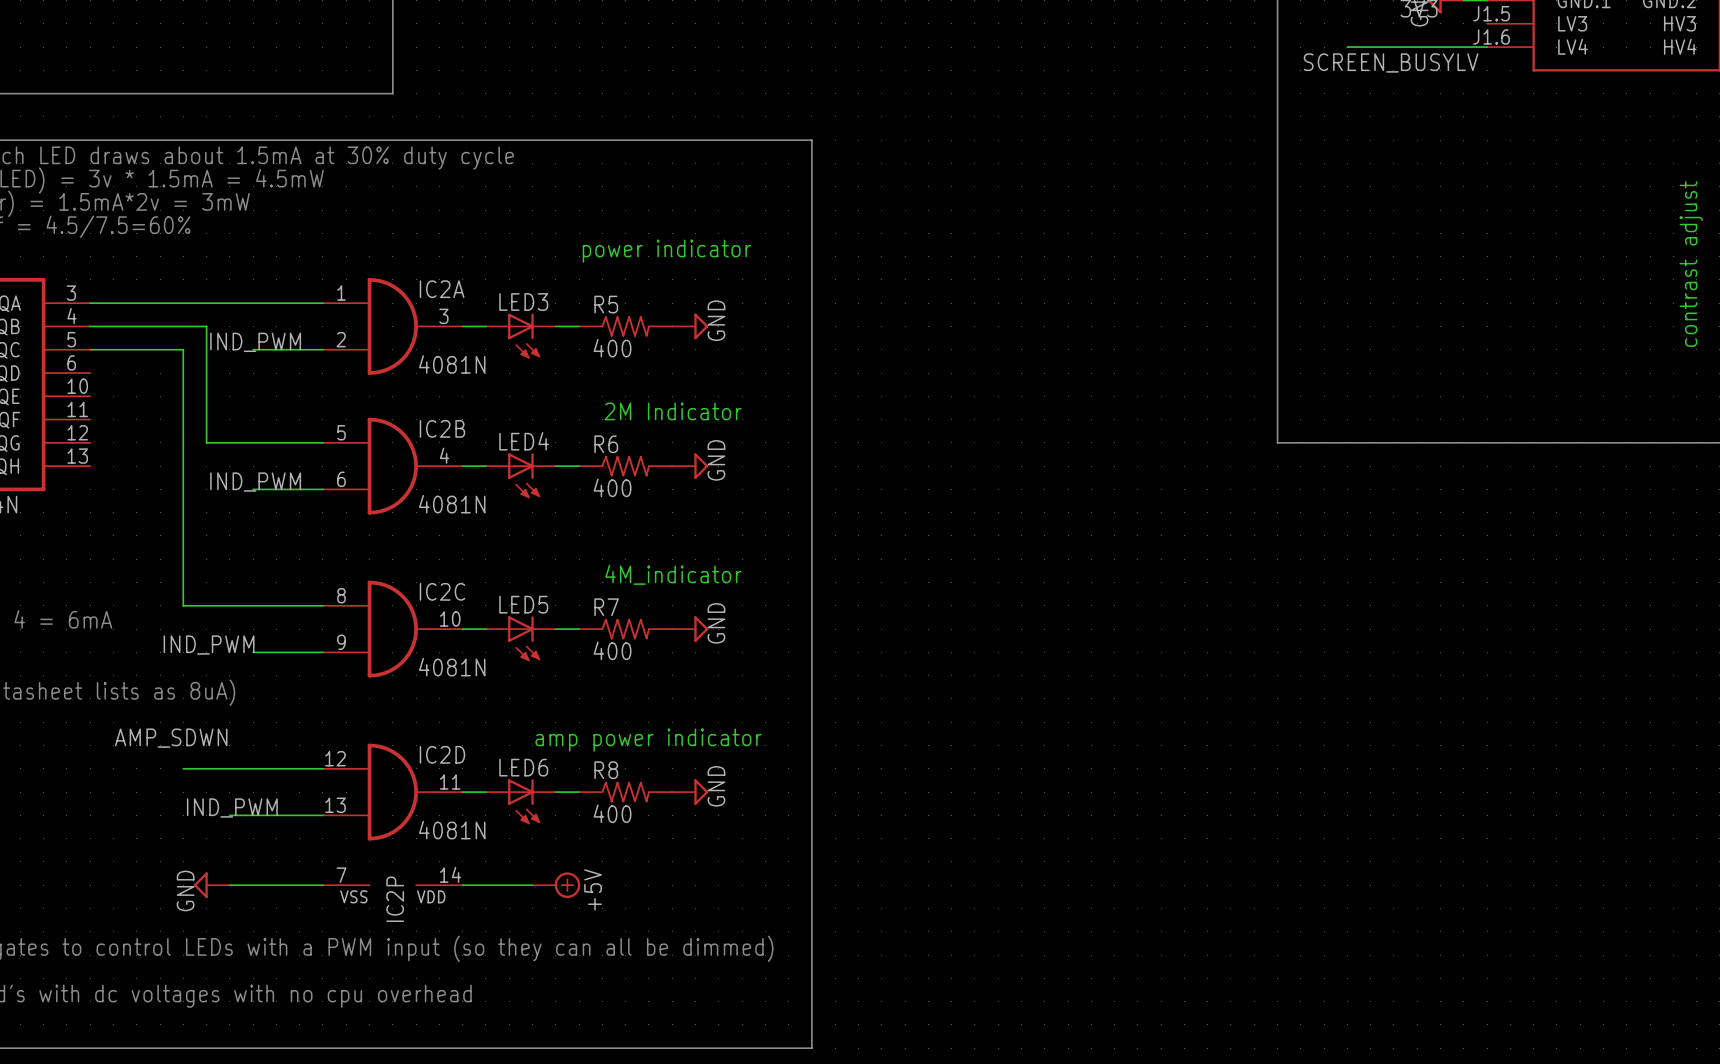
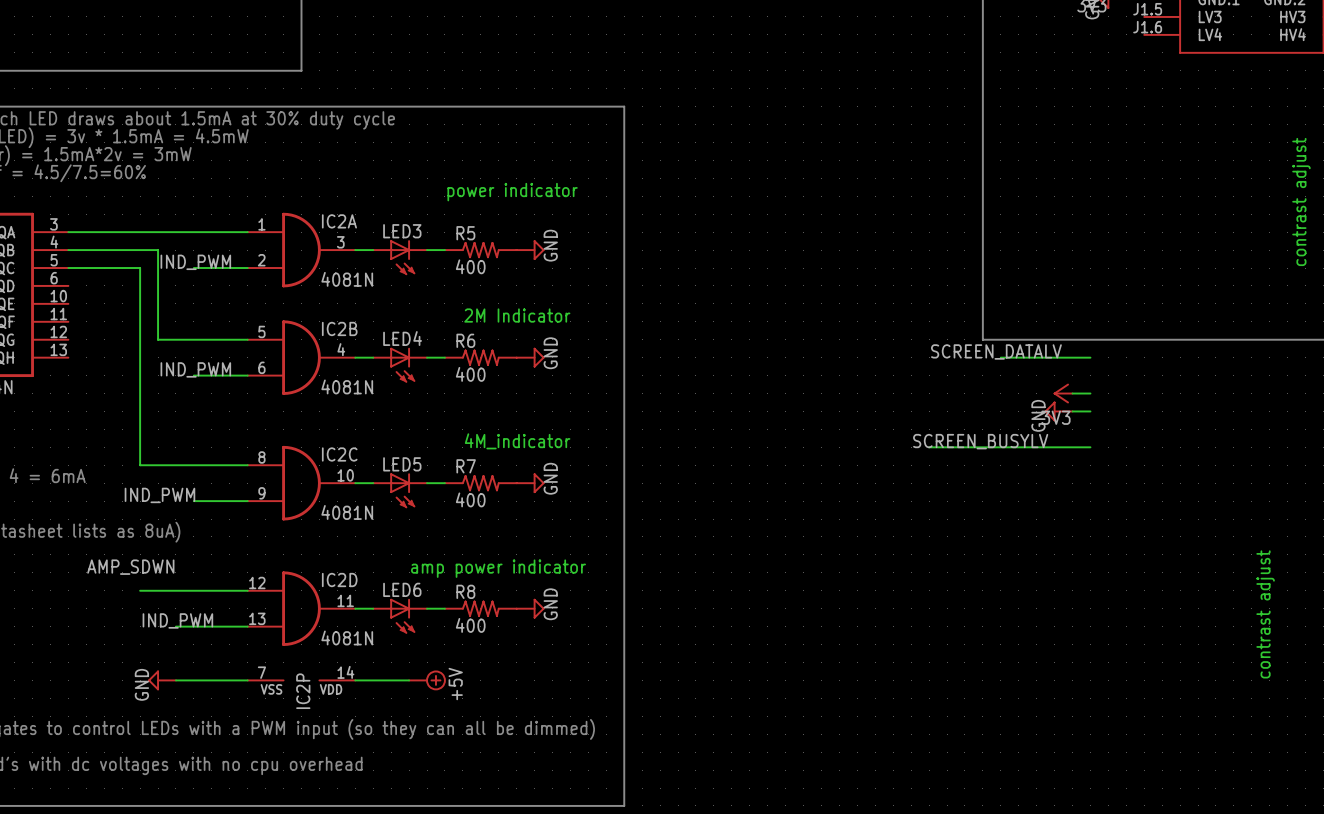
wire: (1347, 47) (1487, 47) -> none
label: SCREEN_BUSYLV (1391, 62) -> none
label: none -> SCREEN_DATALV (996, 351)
wire: none -> (1000, 357) (1090, 357)
power symbol: none -> 3V3 (1063, 393)
wire: none -> (1072, 393) (1090, 393)
power symbol: none -> GND (1058, 411)
wire: none -> (1072, 411) (1090, 411)
label: none -> SCREEN_BUSYLV (980, 441)
wire: none -> (929, 447) (1090, 447)
text: none -> contrast adjust (1265, 614)

